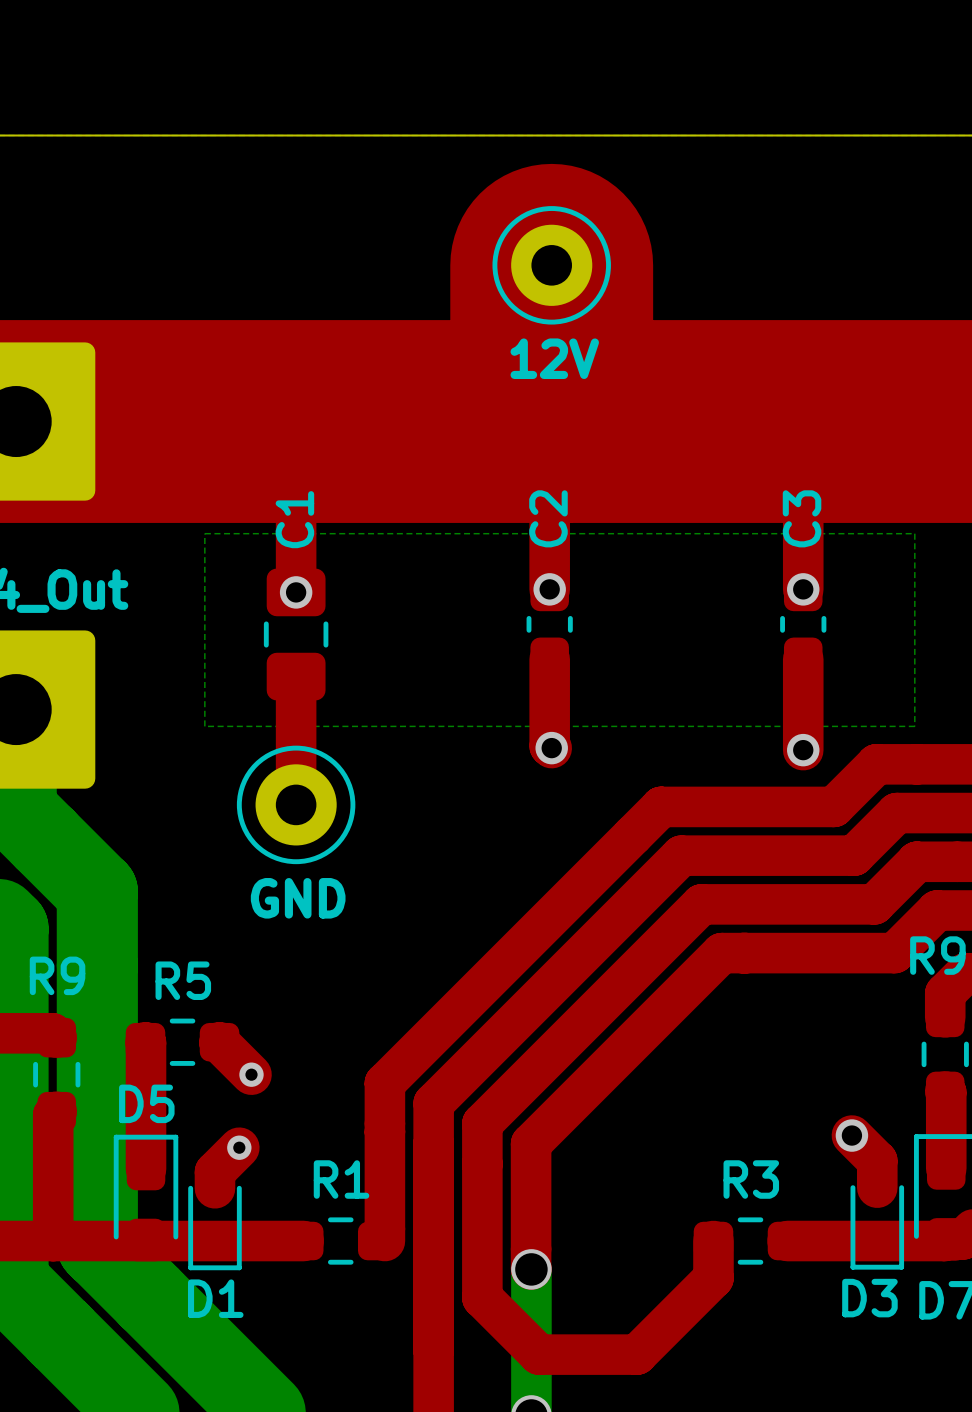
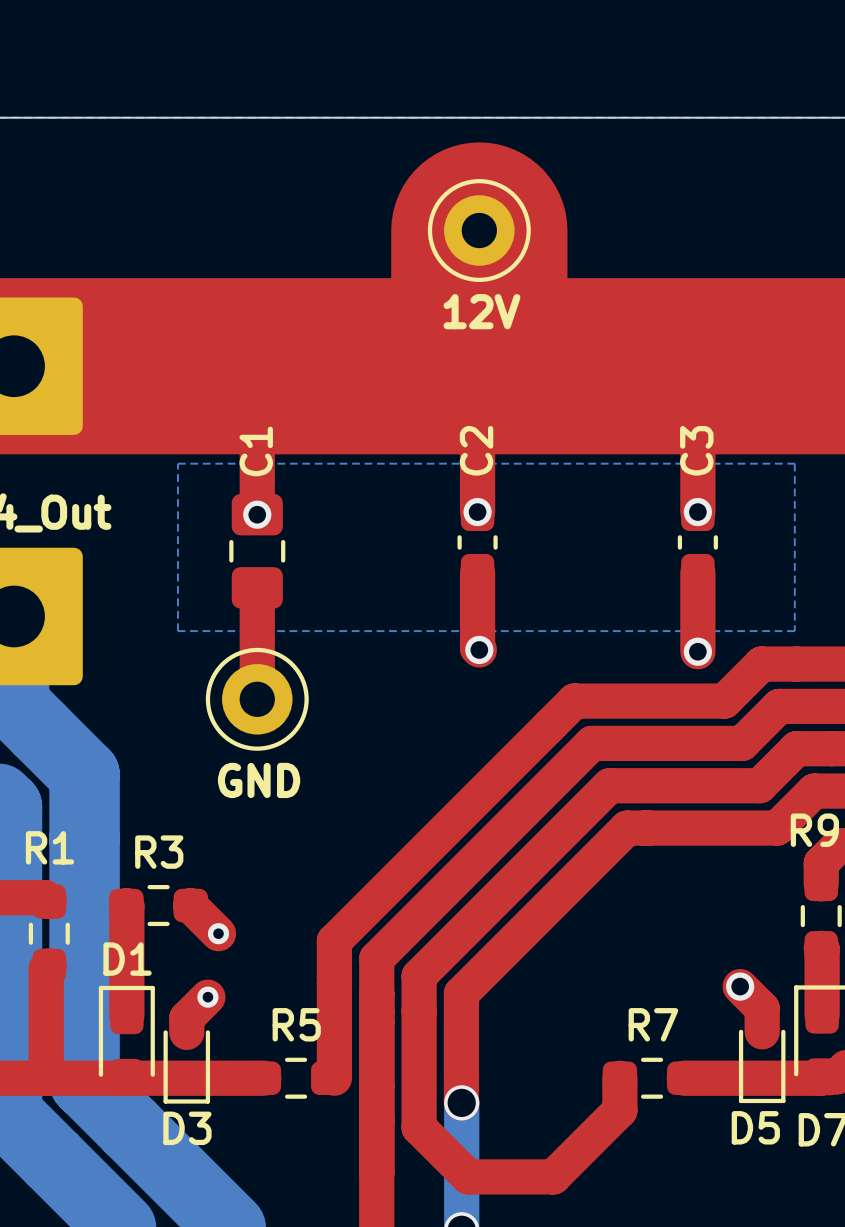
R9 name: R9 (57, 975) -> R1 (49, 847)
R5 name: R5 (183, 980) -> R3 (159, 852)
D5 name: D5 (146, 1103) -> D1 (127, 959)
R1 name: R1 (341, 1179) -> R5 (296, 1024)
R3 name: R3 (751, 1179) -> R7 (653, 1024)
D1 name: D1 (215, 1298) -> D3 (187, 1128)
D3 name: D3 (869, 1298) -> D5 (755, 1127)

